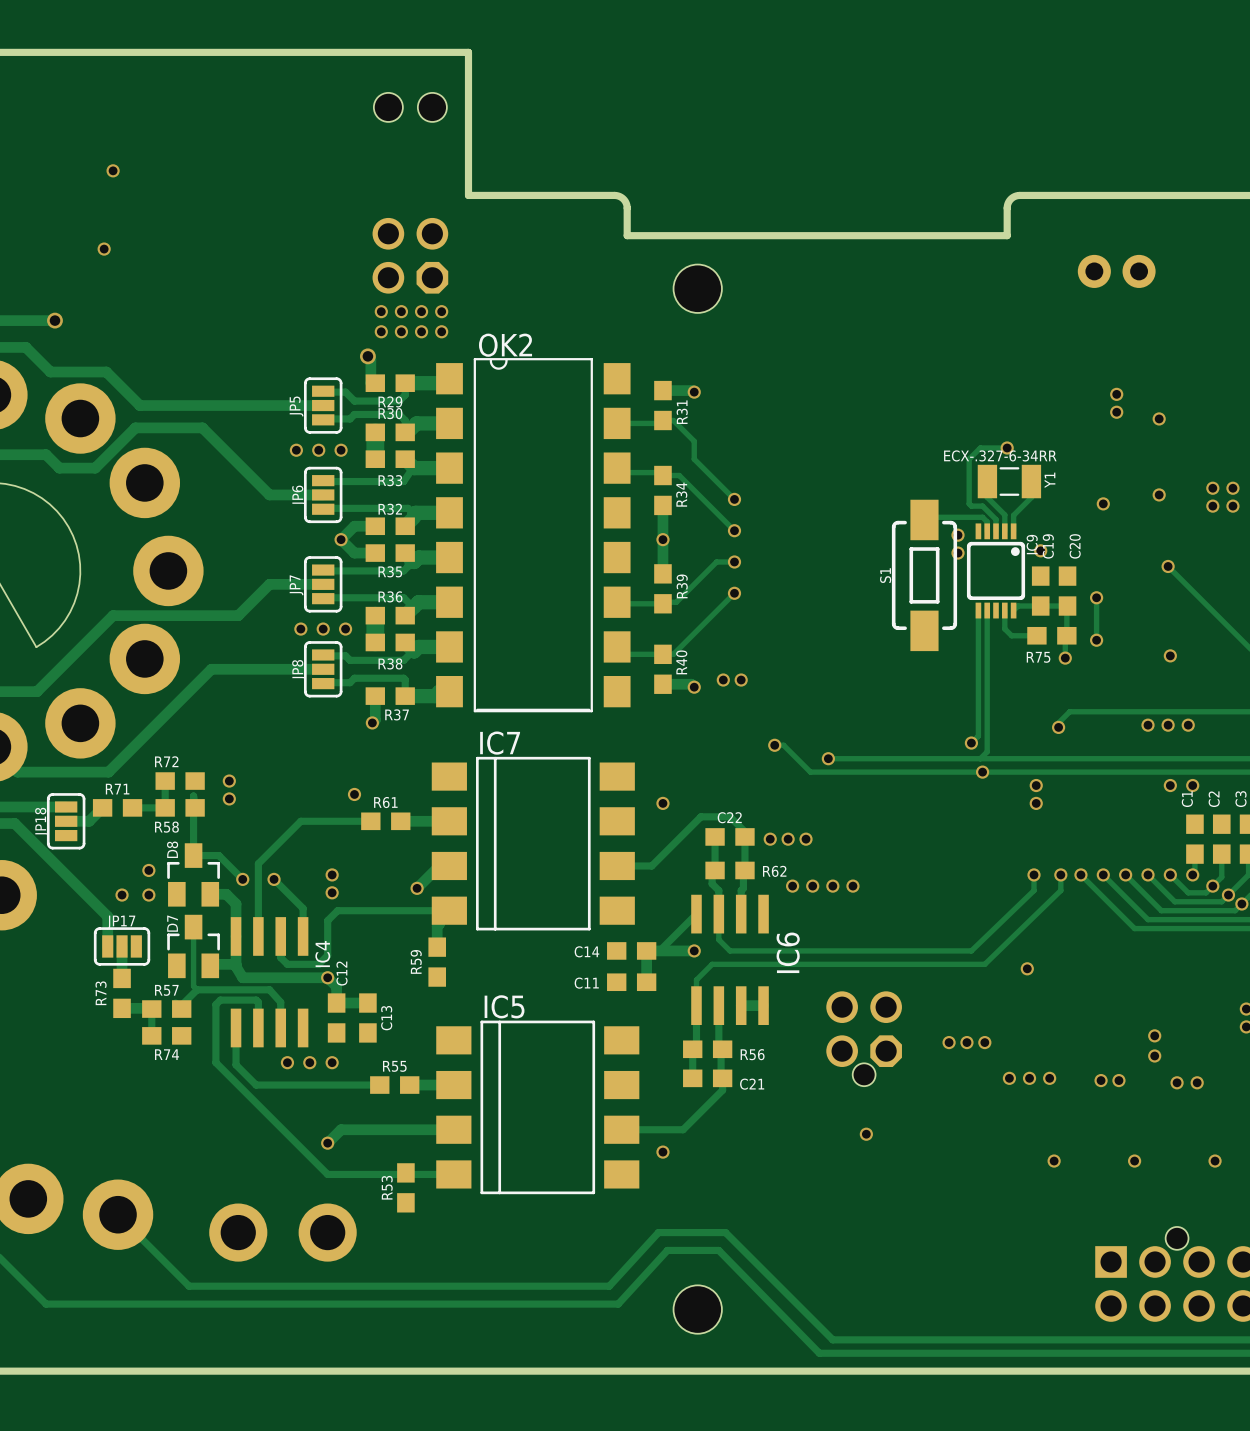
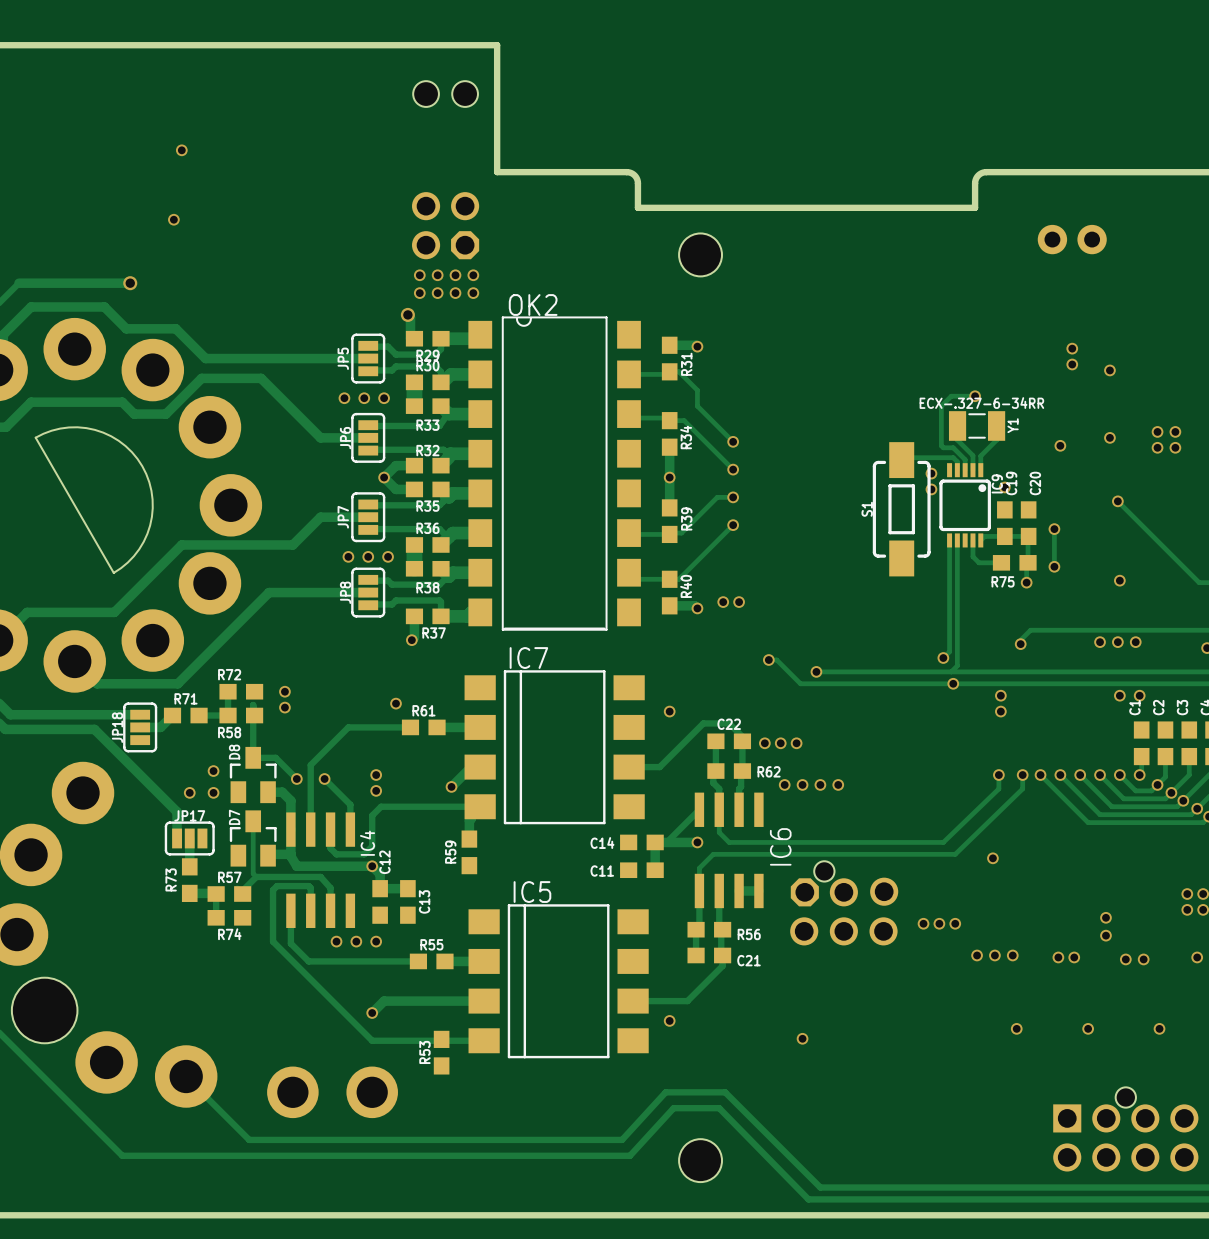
part: none -> (844, 903)
part: (864, 1038) -> none
via position: (866, 1134) -> (802, 1038)

